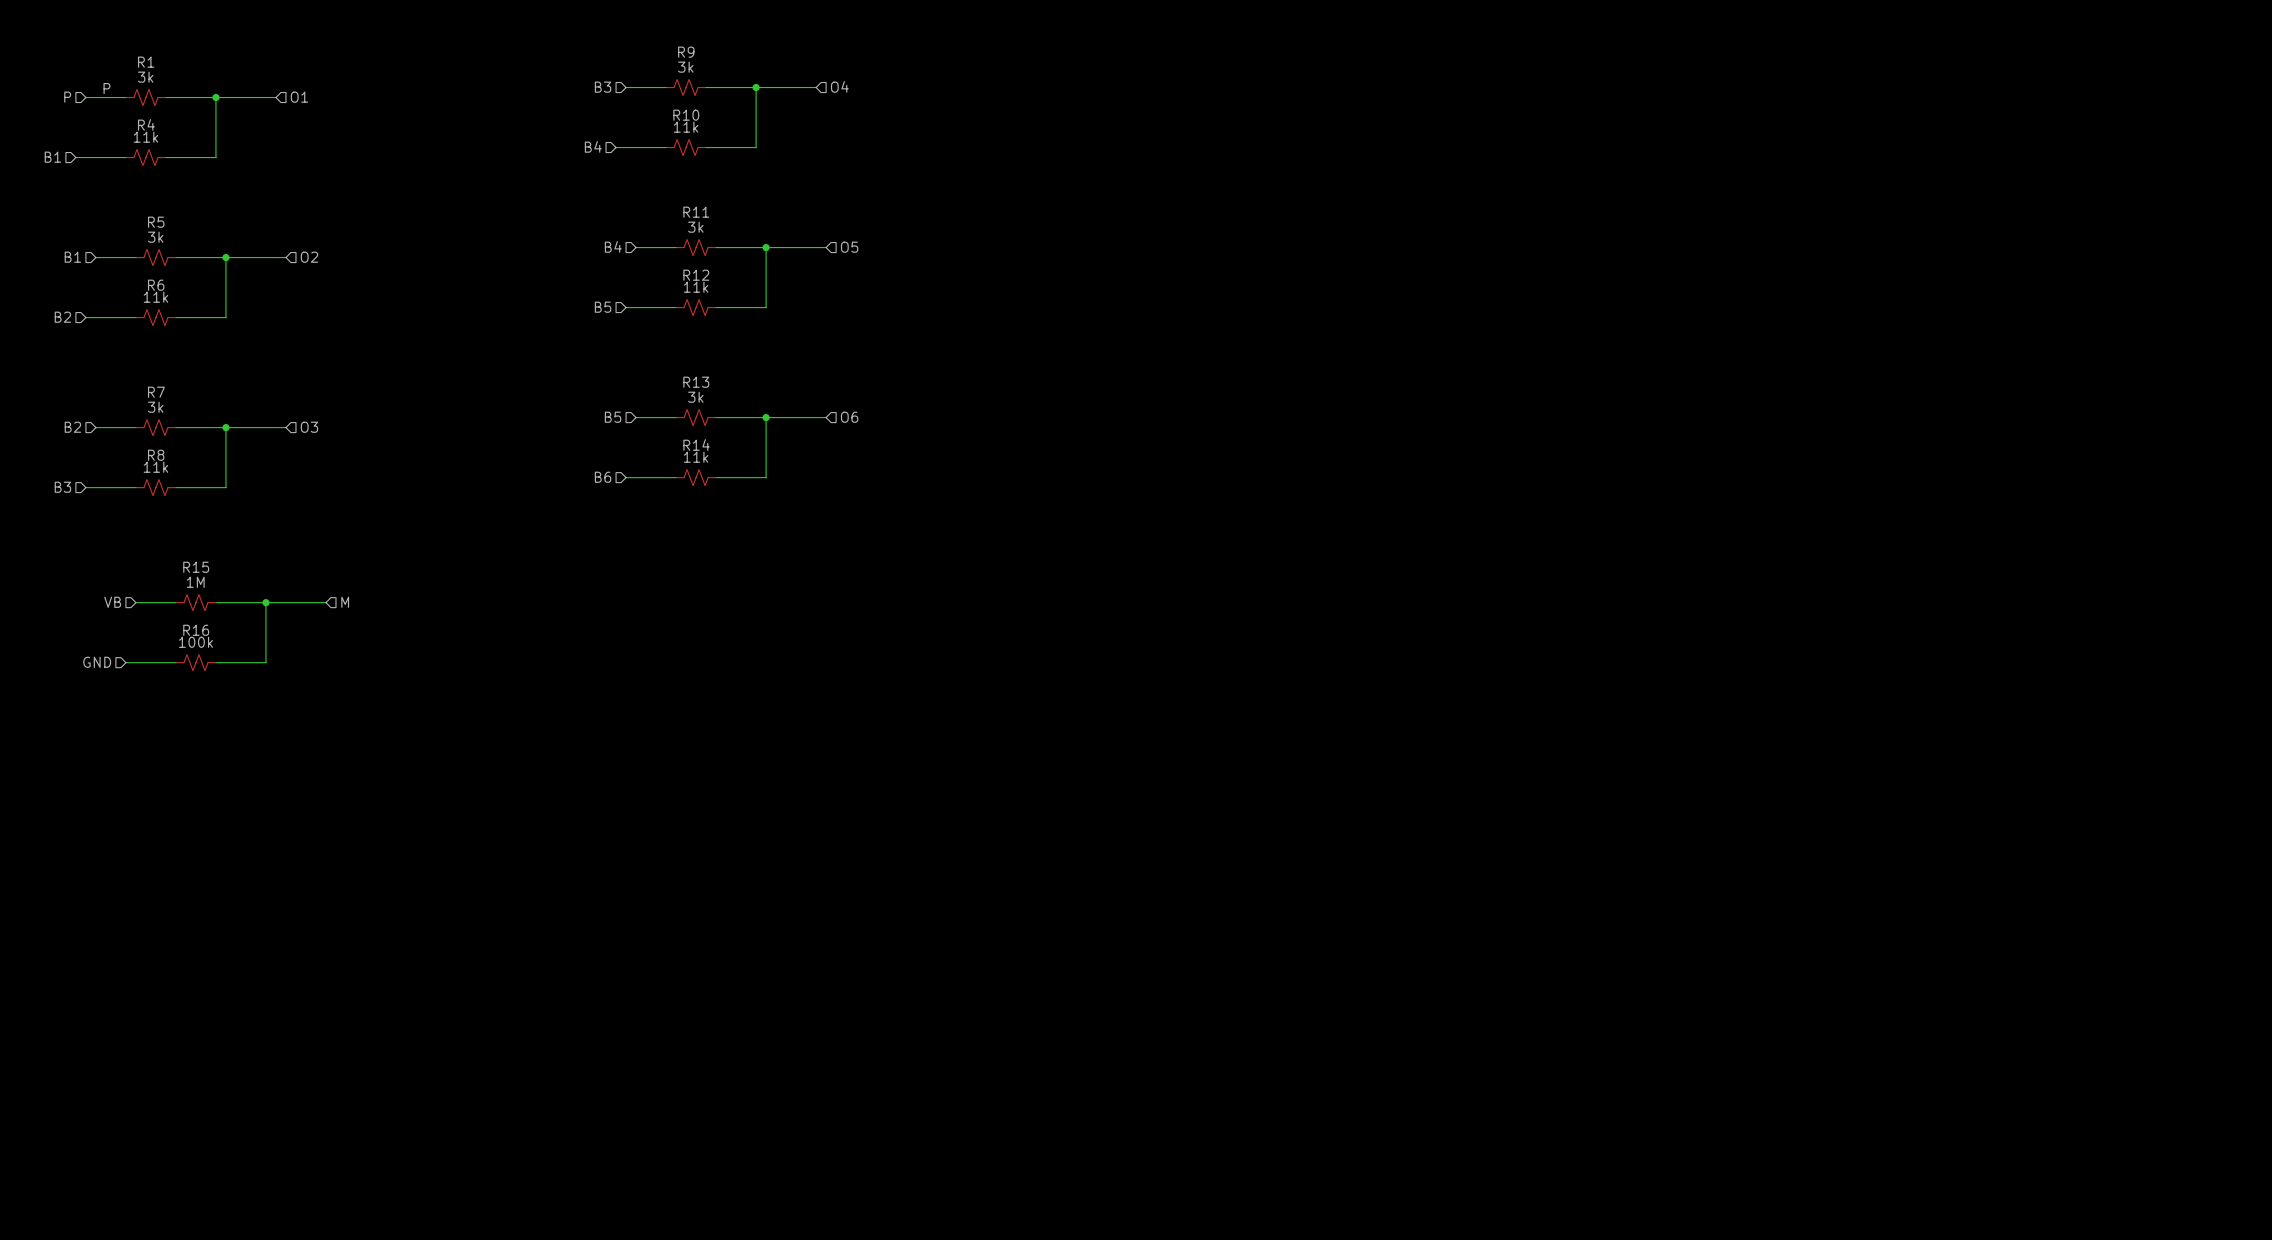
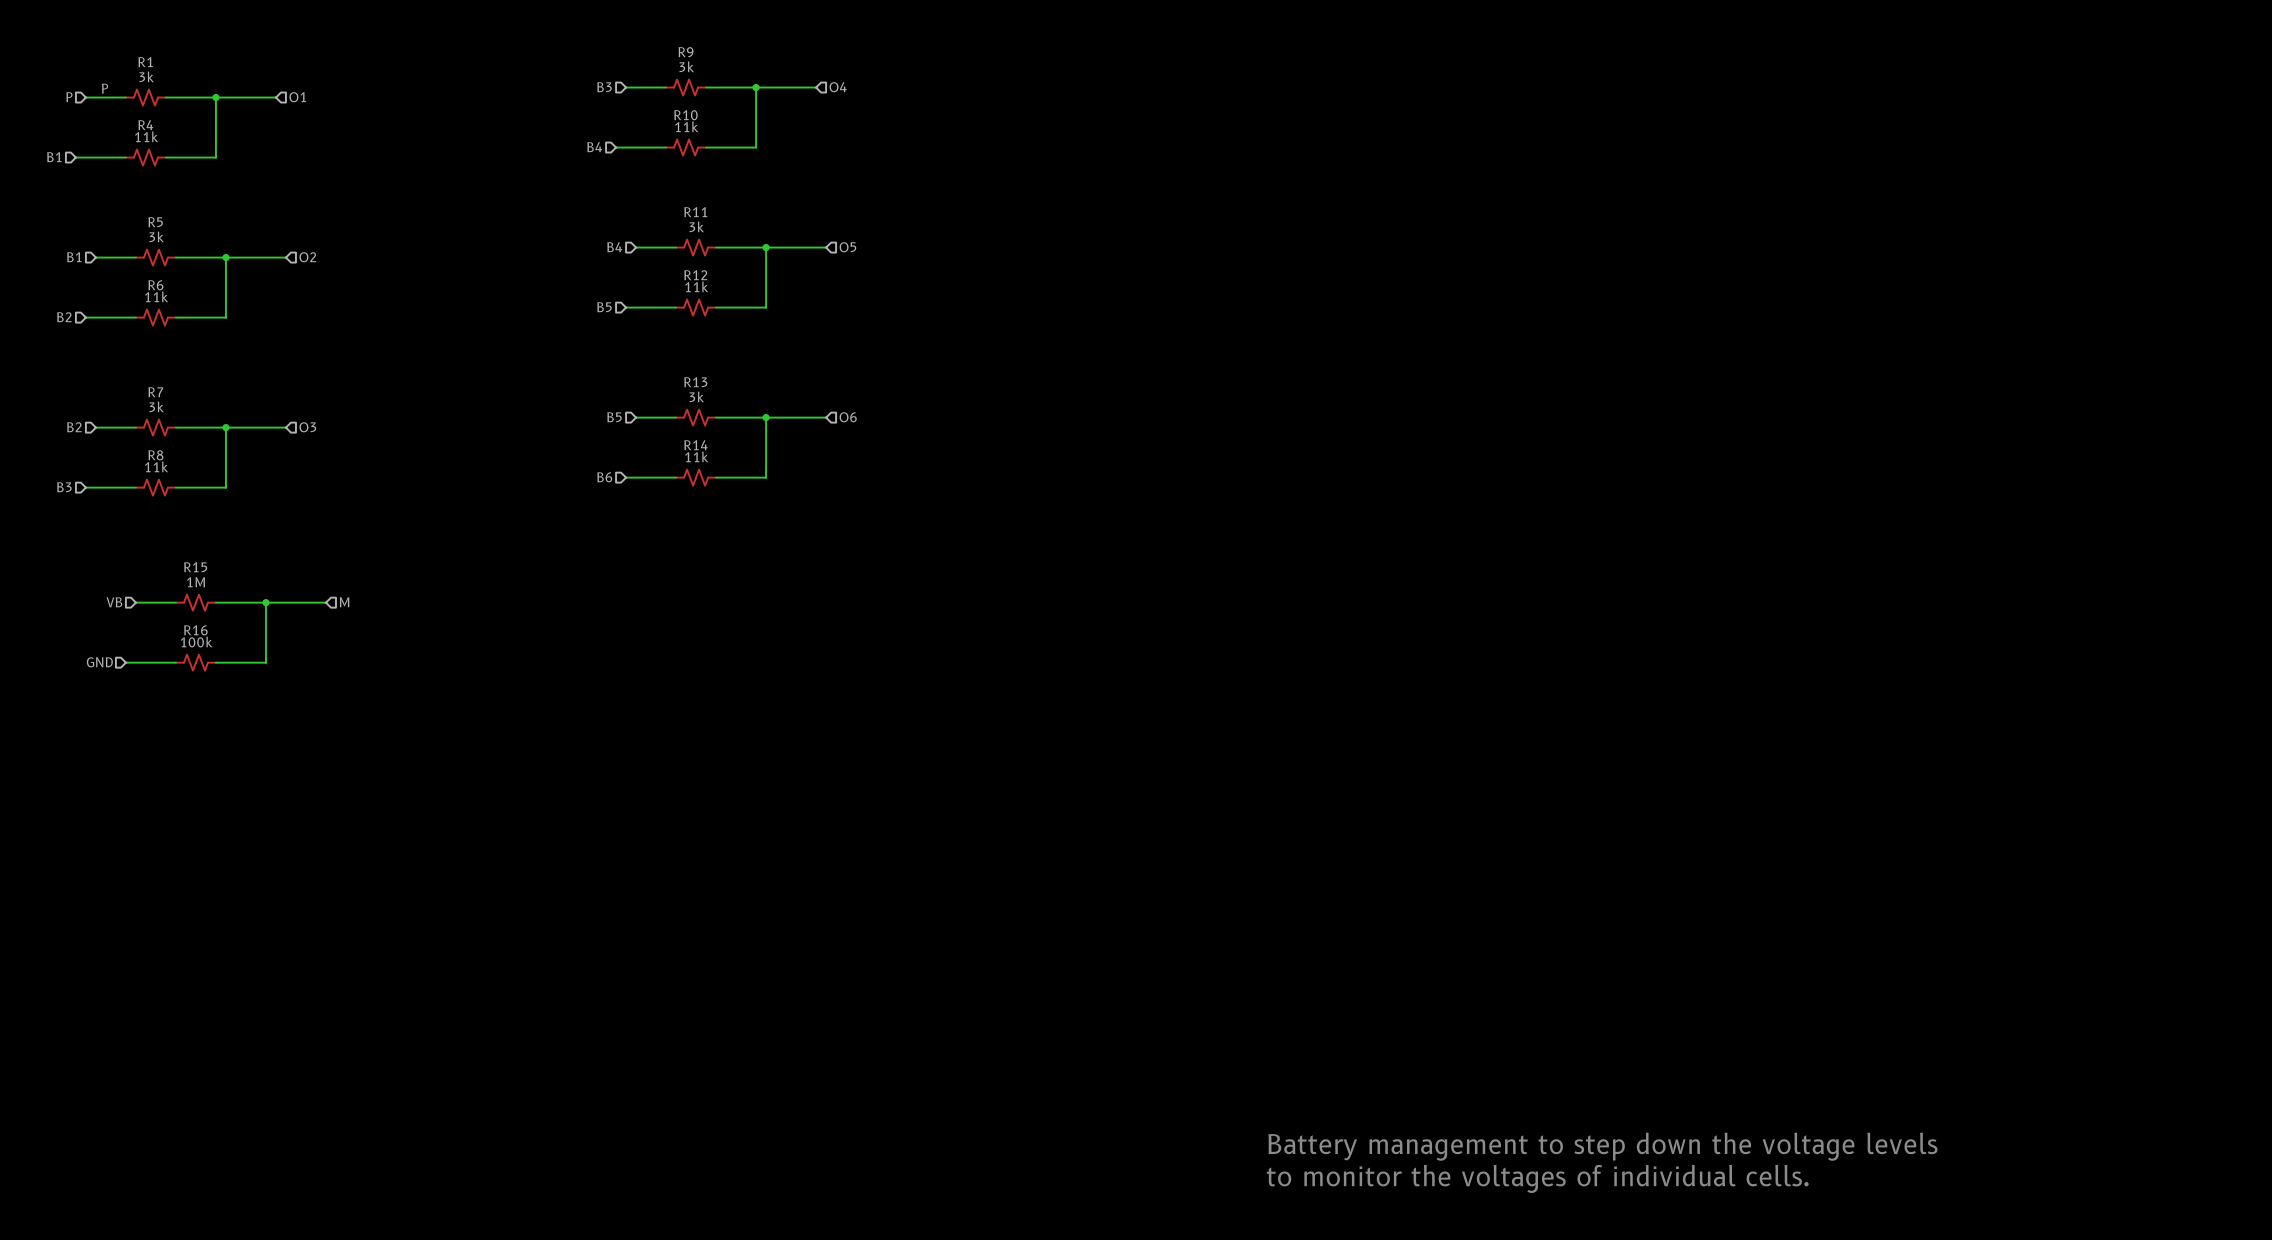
text: none -> Battery management to step down the voltage levels (1602, 1146)
text: none -> to monitor the voltages of individual cells. (1537, 1178)

